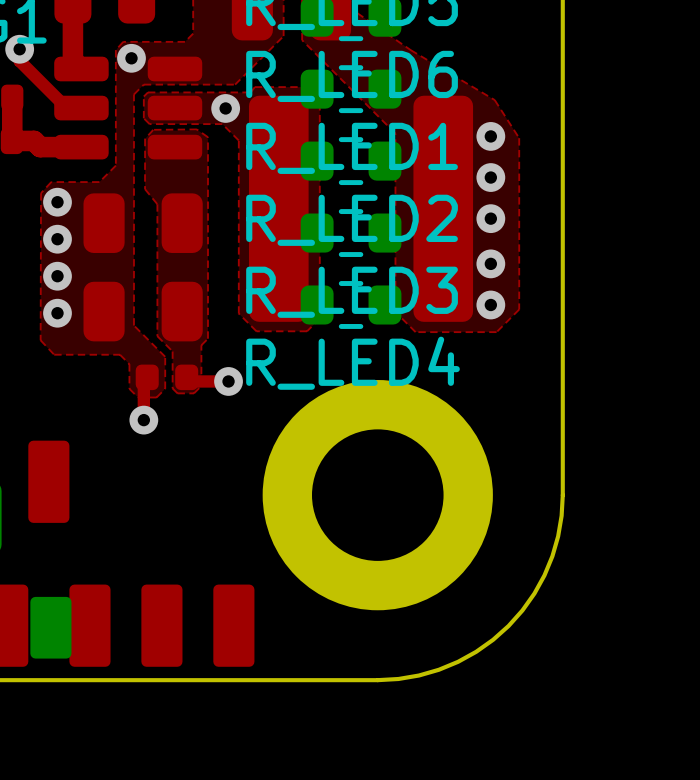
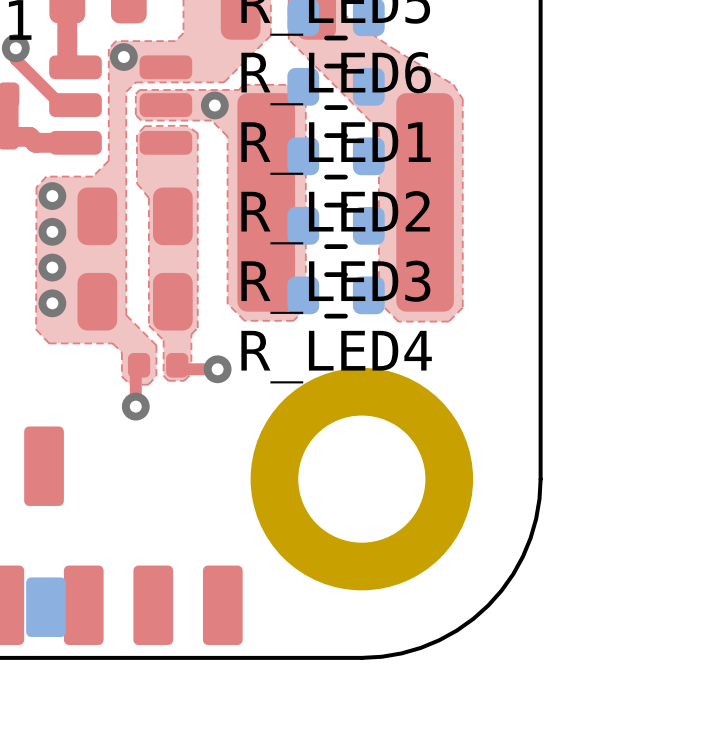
top zone outline: (472, 86) (494, 100) (519, 138) (519, 309) (496, 332) (467, 332) -> (453, 84) (462, 99) (462, 307) (448, 321)
via: (490, 136) -> none
via: (490, 177) -> none
via: (490, 218) -> none
via: (490, 263) -> none
via: (490, 304) -> none

